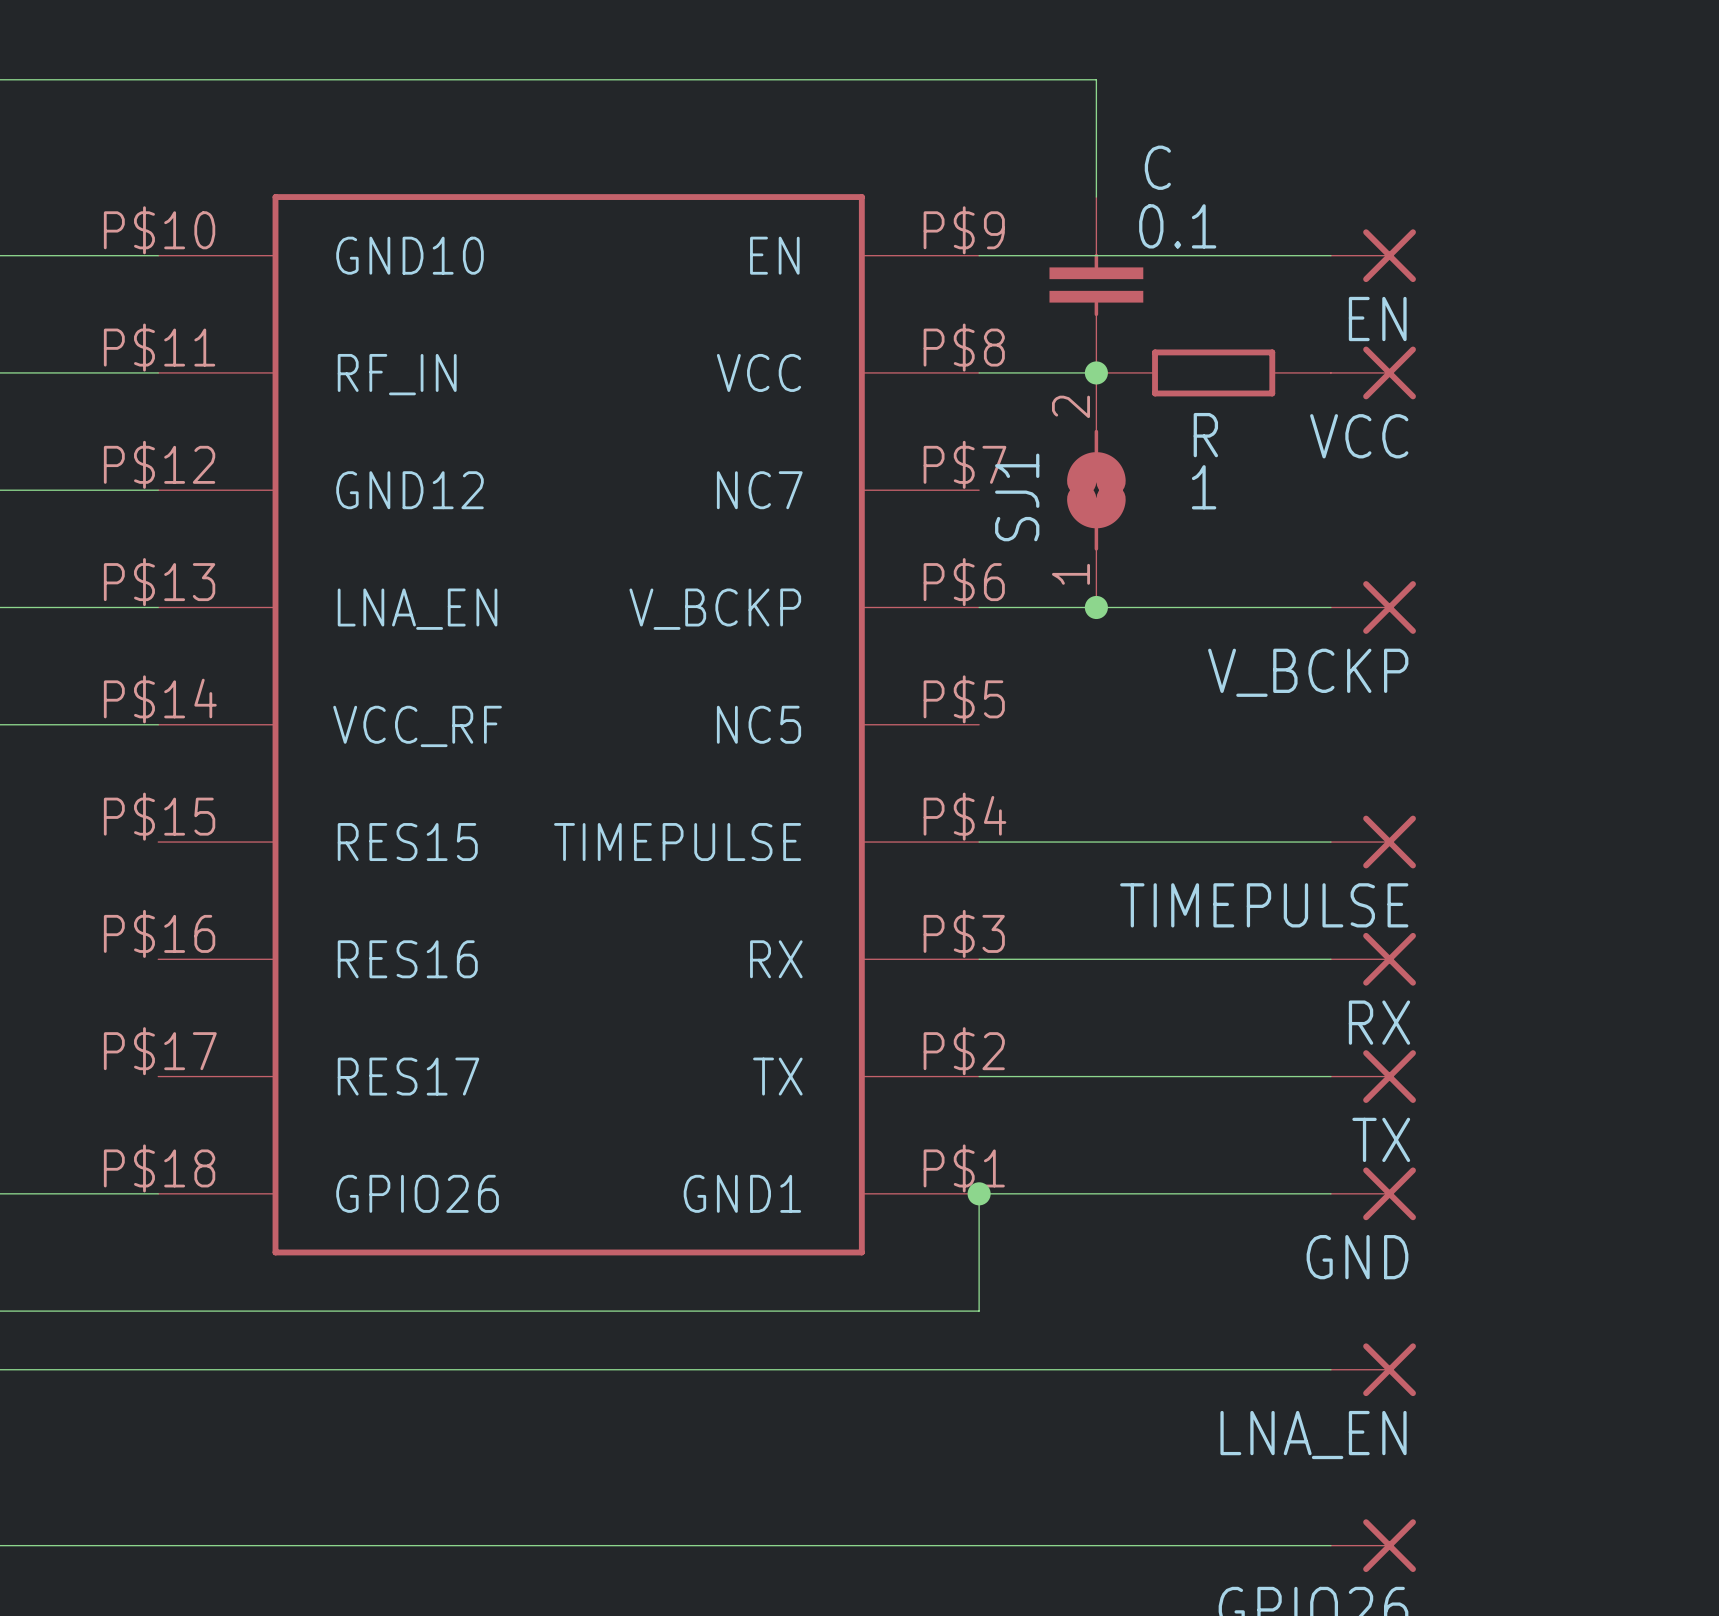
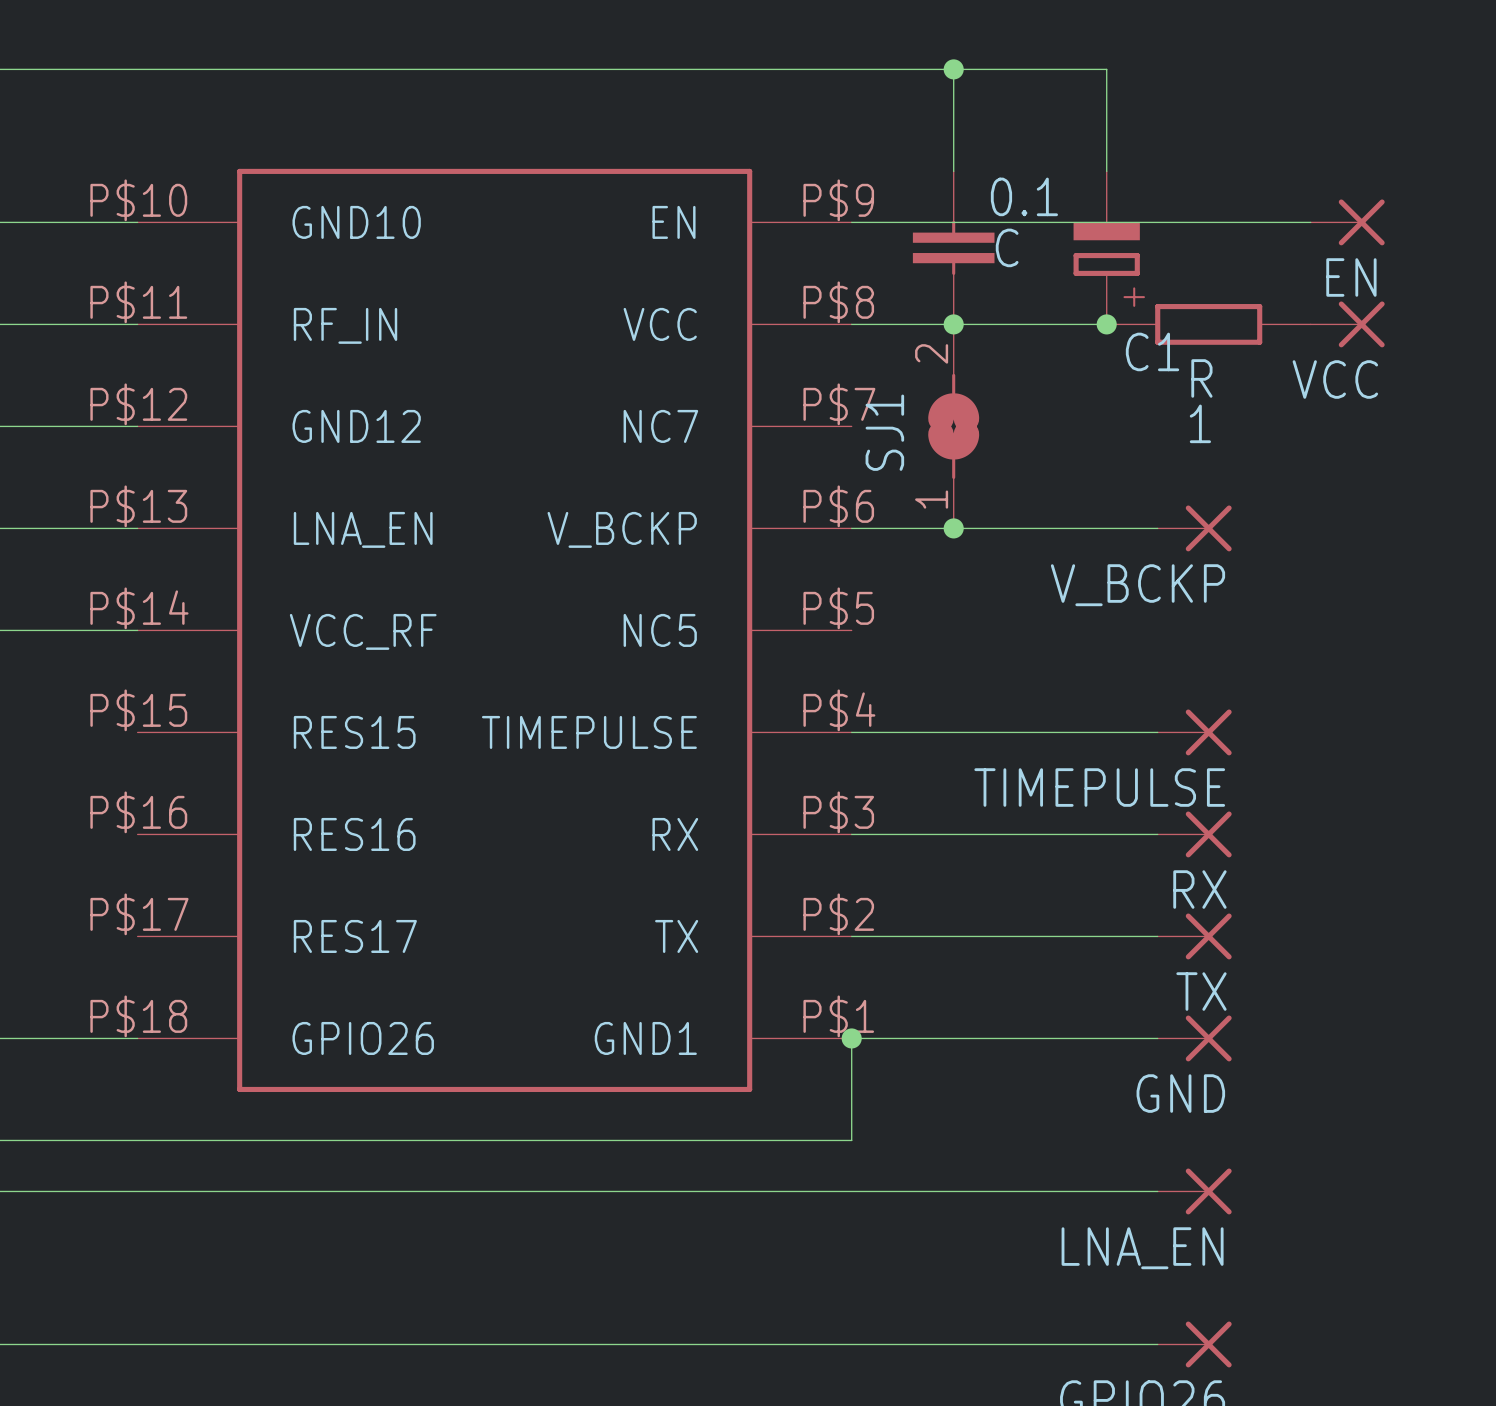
wire: none -> (953, 69) (1106, 69) (1106, 171)
junction: none -> (953, 69)
C name position: C (1157, 167) -> C (1007, 247)
wire: none -> (1157, 222) (1310, 222)
EN position: (1373, 255) -> (1347, 222)
C1: none -> (1106, 247)
wire: none -> (953, 324) (1106, 324)
R position: (1213, 372) -> (1208, 324)
junction: none -> (1106, 324)
VCC position: (1373, 372) -> (1347, 324)

